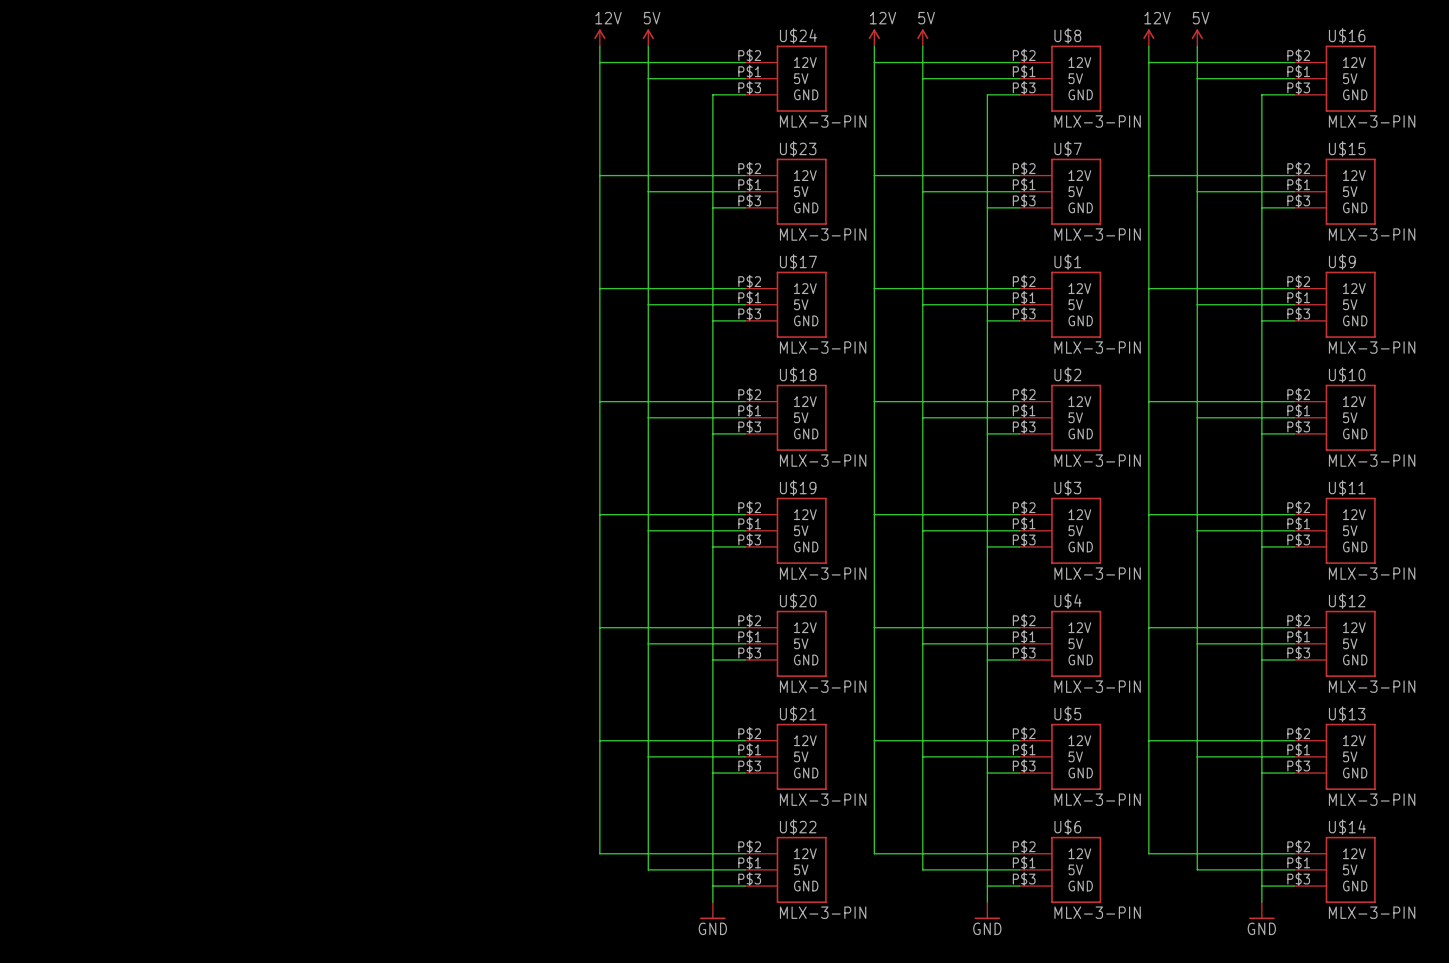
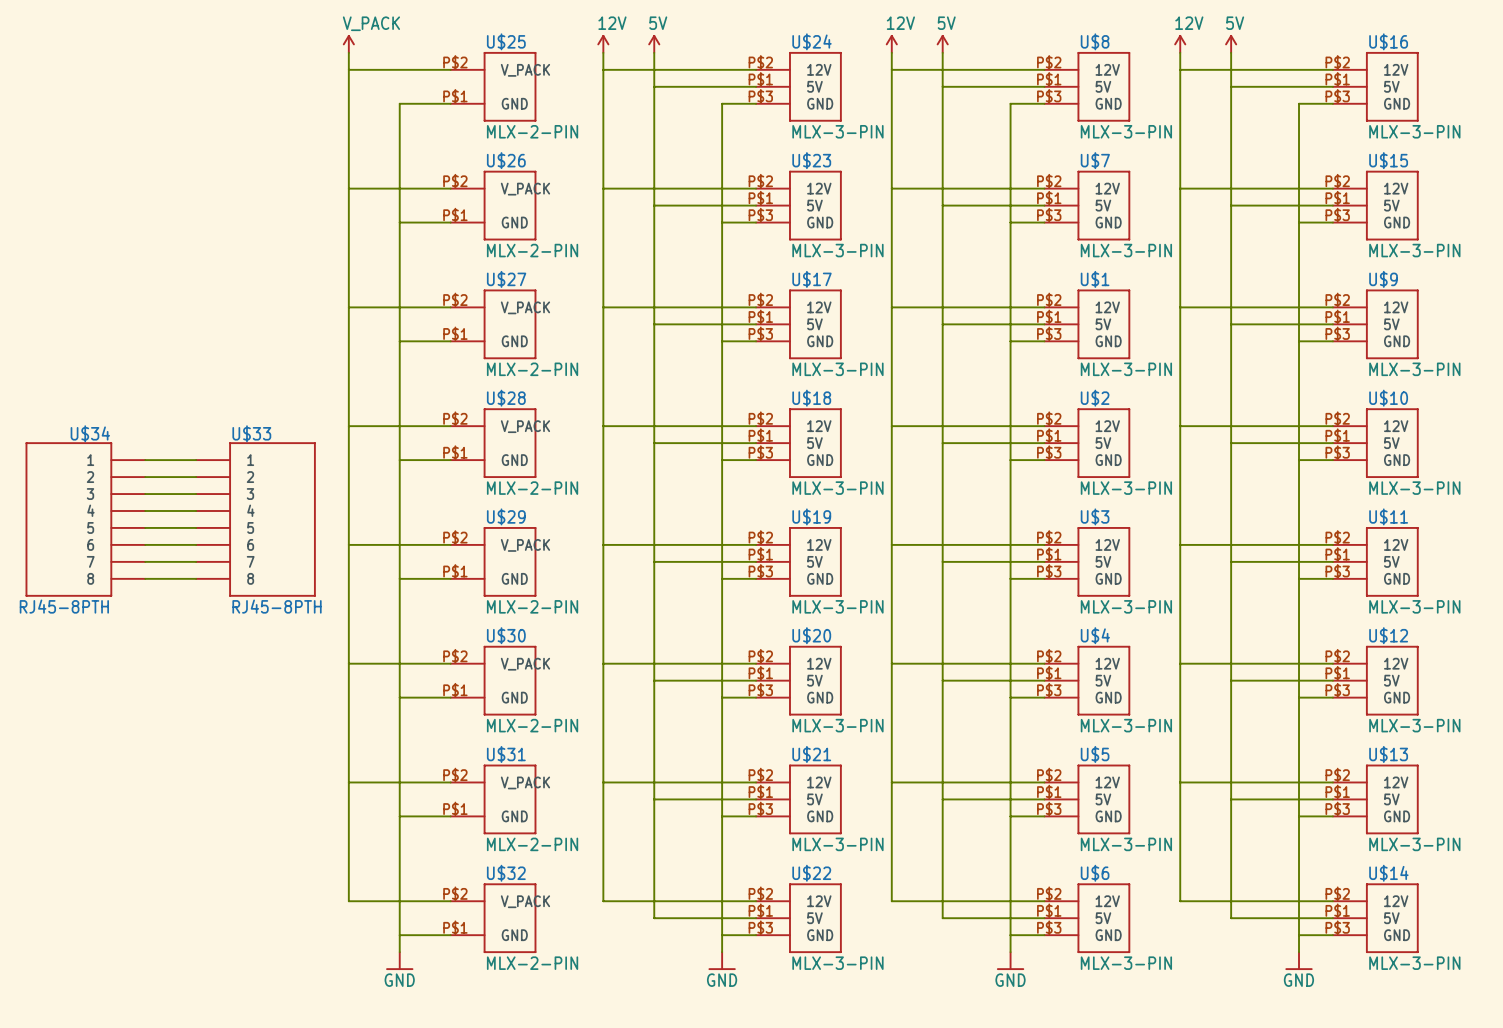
power symbol: none -> V_PACK (348, 43)
wire: none -> (348, 52) (348, 901) (450, 901)
wire: none -> (348, 69) (450, 69)
U$25: none -> MLX-2-PIN (493, 86)
wire: none -> (450, 103) (399, 103) (399, 952)
wire: none -> (348, 188) (450, 188)
U$26: none -> MLX-2-PIN (493, 205)
wire: none -> (399, 222) (450, 222)
wire: none -> (348, 307) (450, 307)
U$27: none -> MLX-2-PIN (493, 324)
wire: none -> (399, 341) (450, 341)
wire: none -> (348, 426) (450, 426)
U$28: none -> MLX-2-PIN (493, 443)
wire: none -> (145, 460) (196, 460)
wire: none -> (399, 460) (450, 460)
wire: none -> (145, 477) (196, 477)
wire: none -> (145, 494) (196, 494)
wire: none -> (145, 510) (196, 510)
U$34: none -> RJ45-8PTH (85, 519)
U$33: none -> RJ45-8PTH (255, 519)
wire: none -> (145, 527) (196, 527)
wire: none -> (145, 544) (196, 544)
wire: none -> (348, 544) (450, 544)
wire: none -> (145, 561) (196, 561)
U$29: none -> MLX-2-PIN (493, 561)
wire: none -> (145, 578) (196, 578)
wire: none -> (399, 578) (450, 578)
wire: none -> (348, 663) (450, 663)
U$30: none -> MLX-2-PIN (493, 680)
wire: none -> (399, 697) (450, 697)
wire: none -> (348, 782) (450, 782)
U$31: none -> MLX-2-PIN (493, 799)
wire: none -> (399, 816) (450, 816)
U$32: none -> MLX-2-PIN (493, 918)
wire: none -> (399, 935) (450, 935)
power symbol: none -> GND (399, 961)

